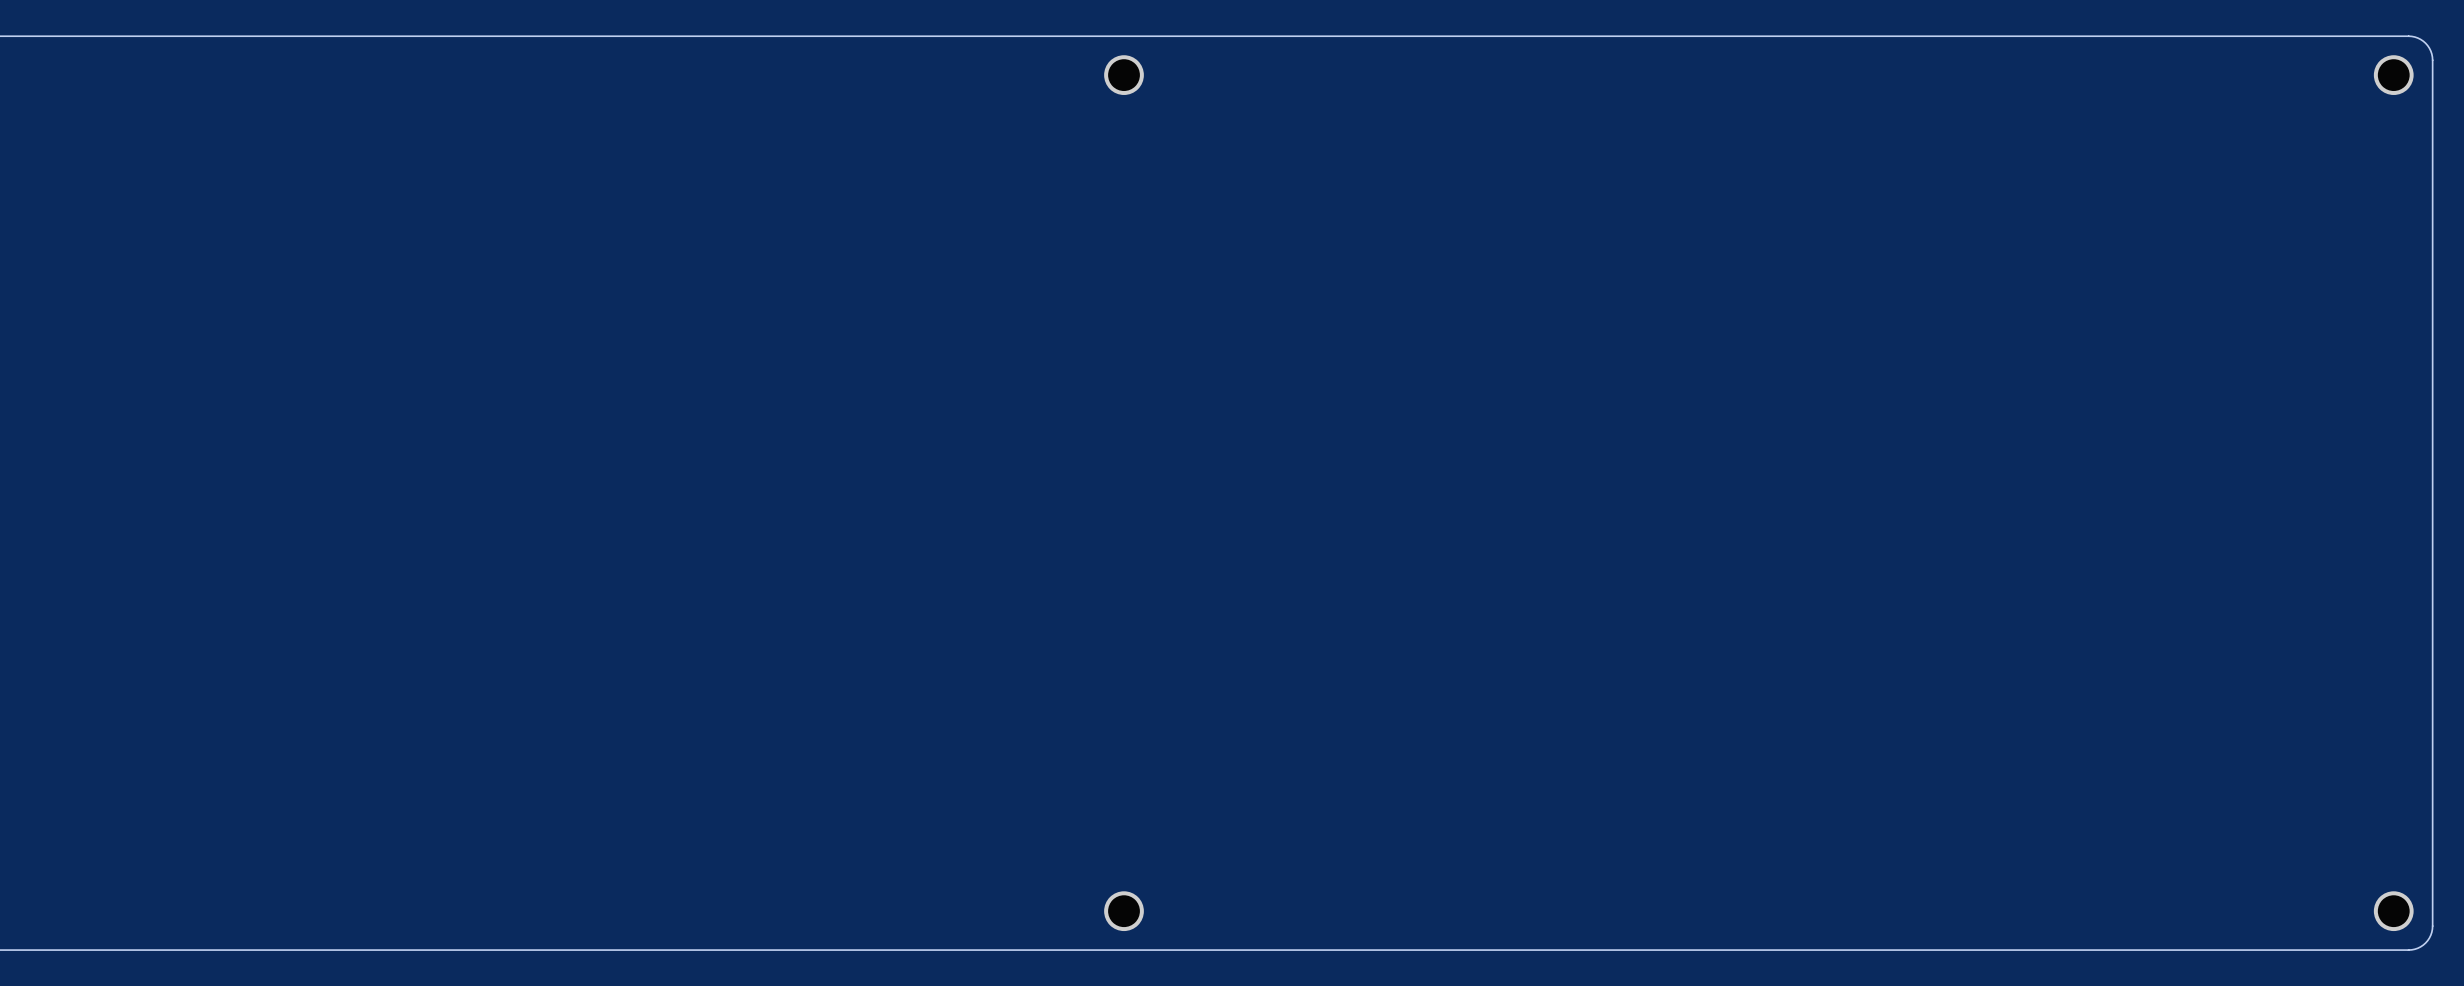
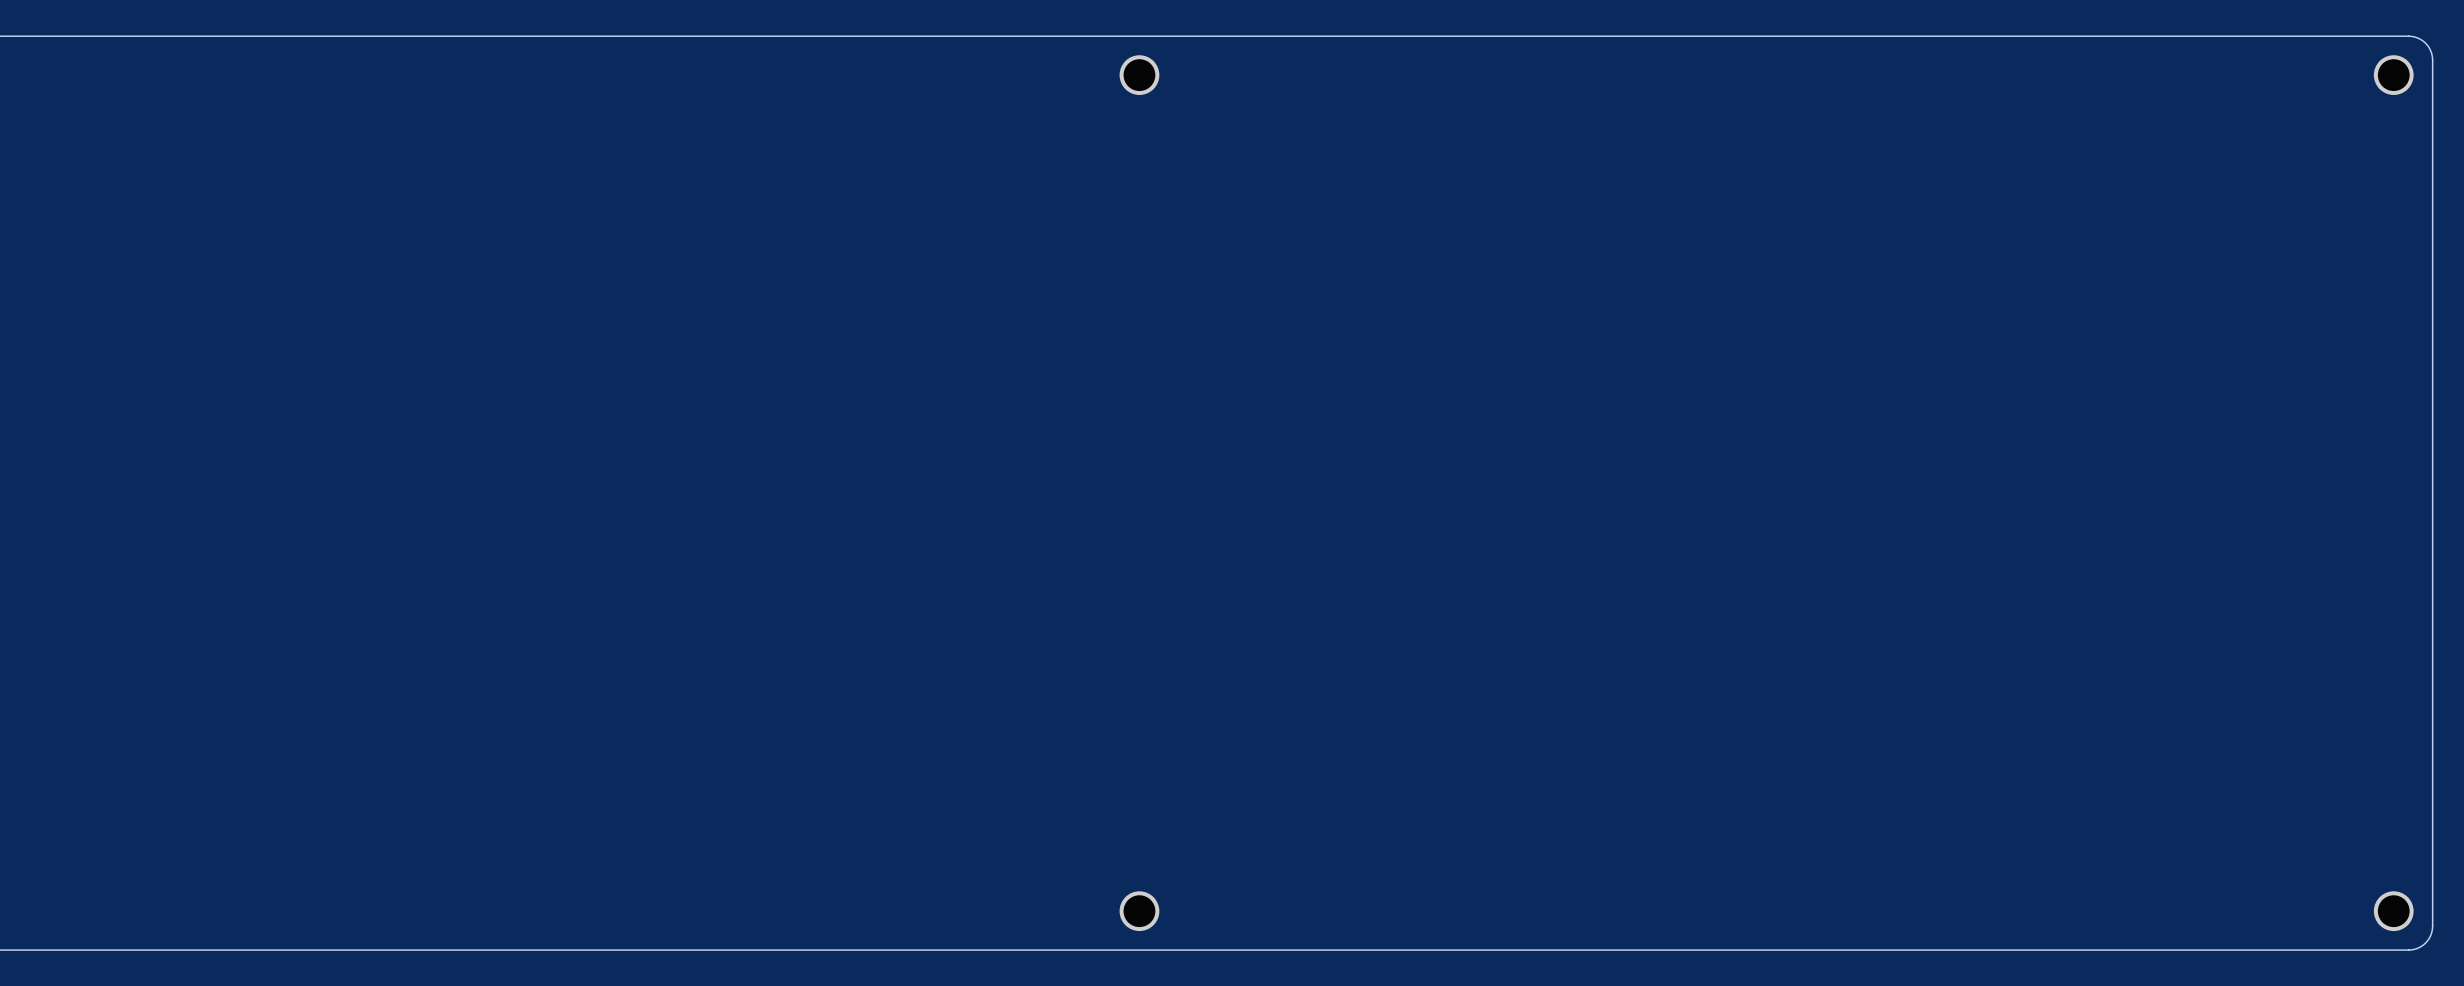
part position: (1124, 75) -> (1139, 75)
part position: (1124, 911) -> (1139, 911)

